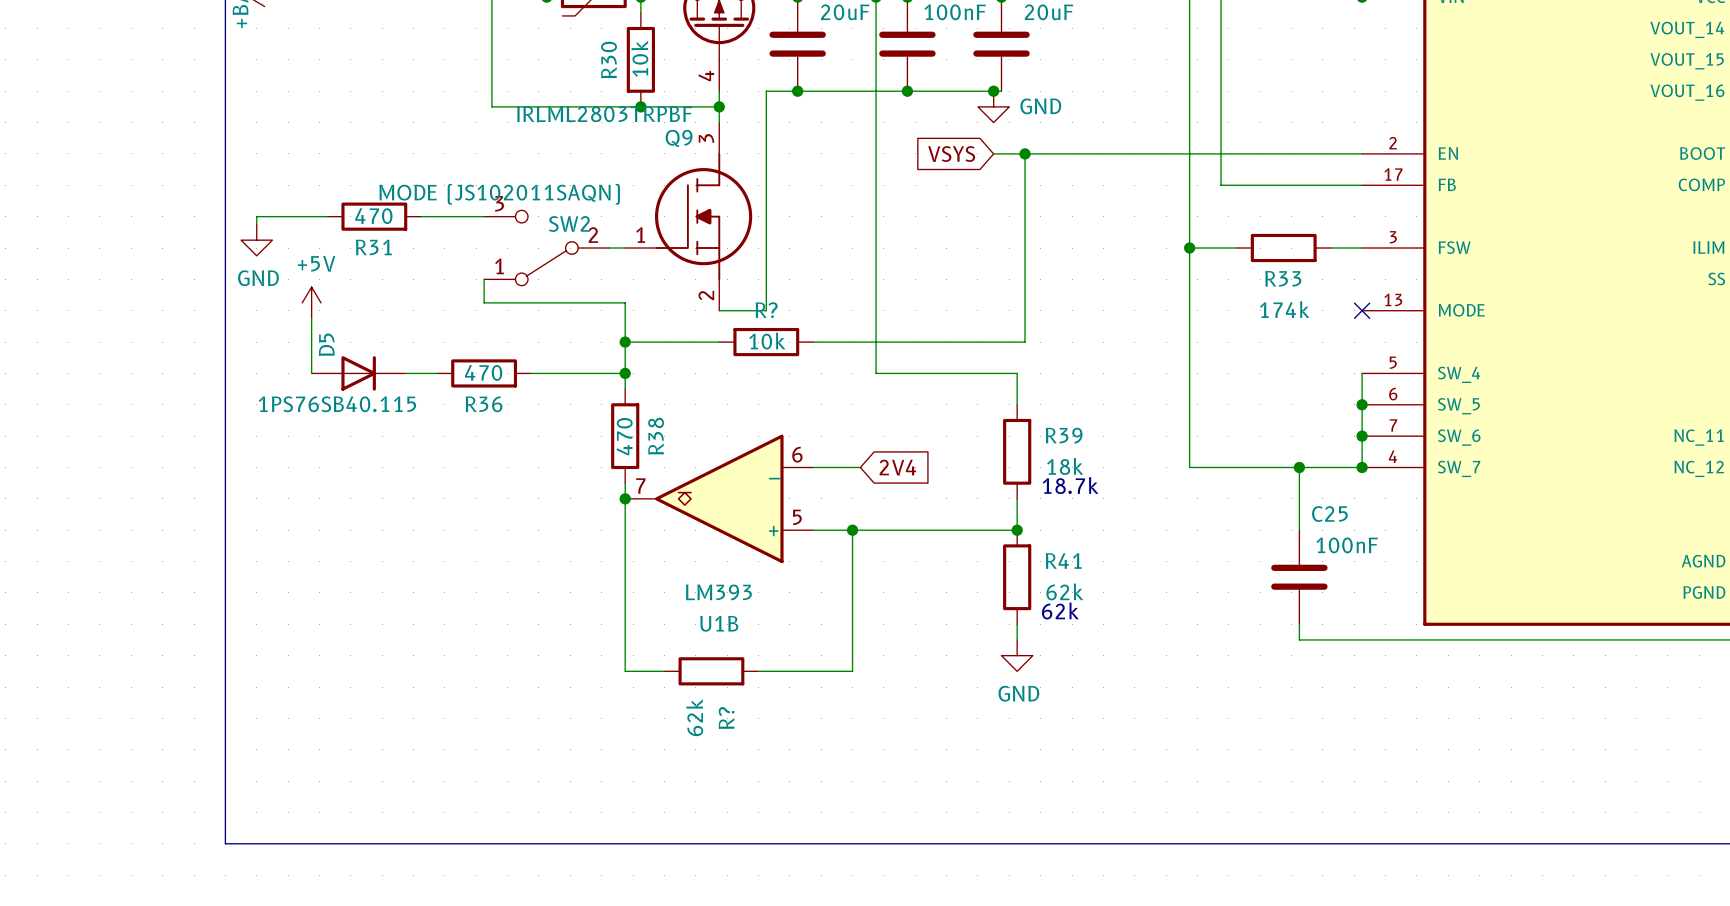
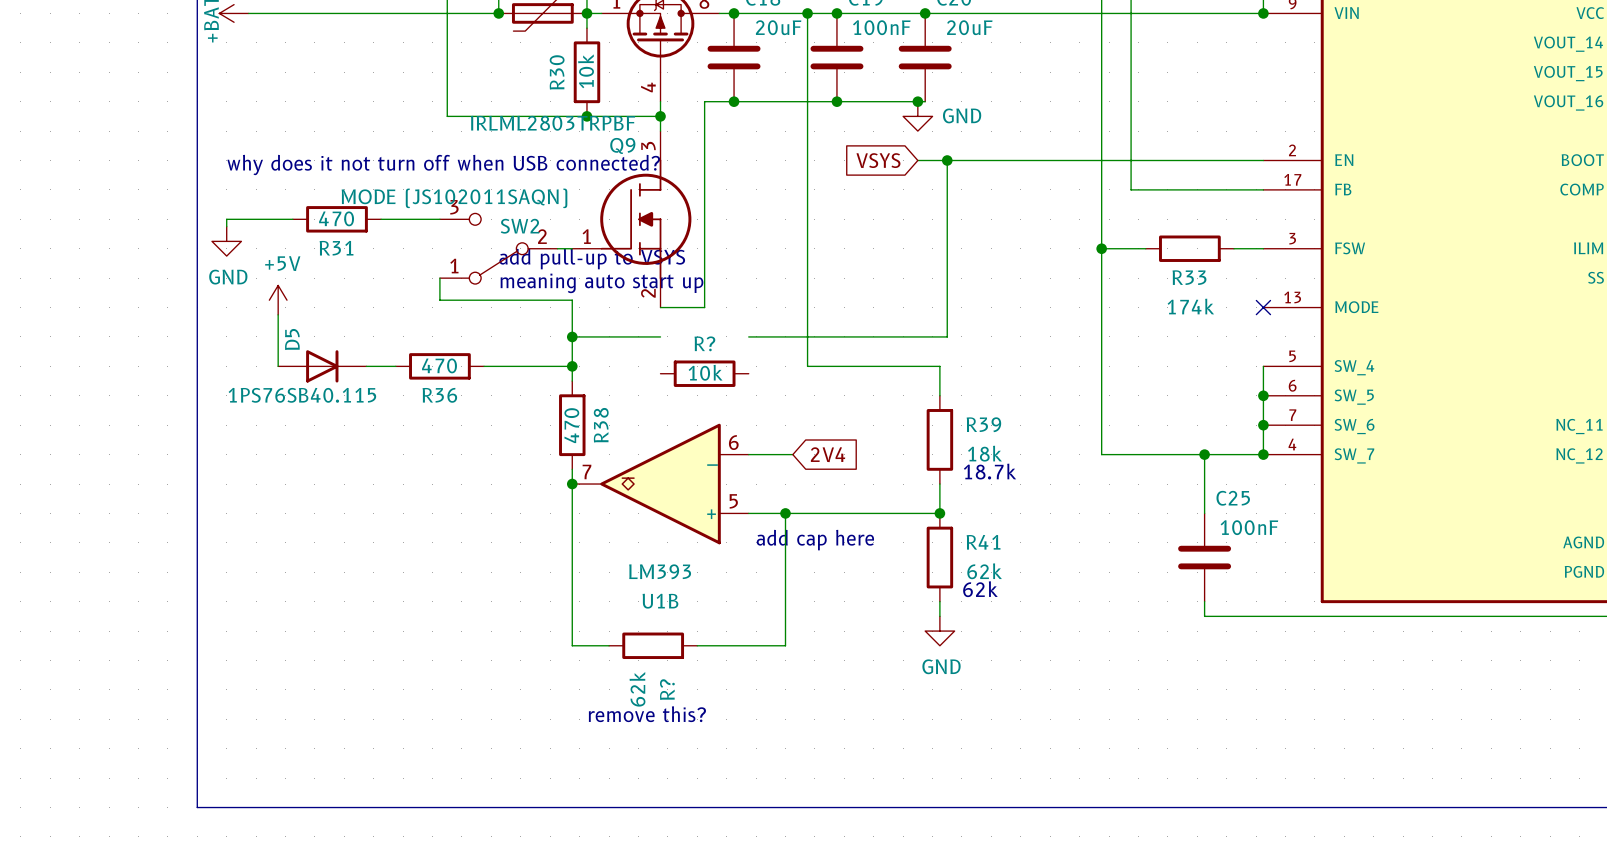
text: none -> why does it not turn off when USB connected? (443, 165)
text: none -> add pull-up to VSYS (592, 259)
text: none -> meaning auto start up (602, 283)
R? position: (766, 342) -> (704, 373)
text: none -> add cap here (815, 540)
text: none -> remove this? (647, 714)

